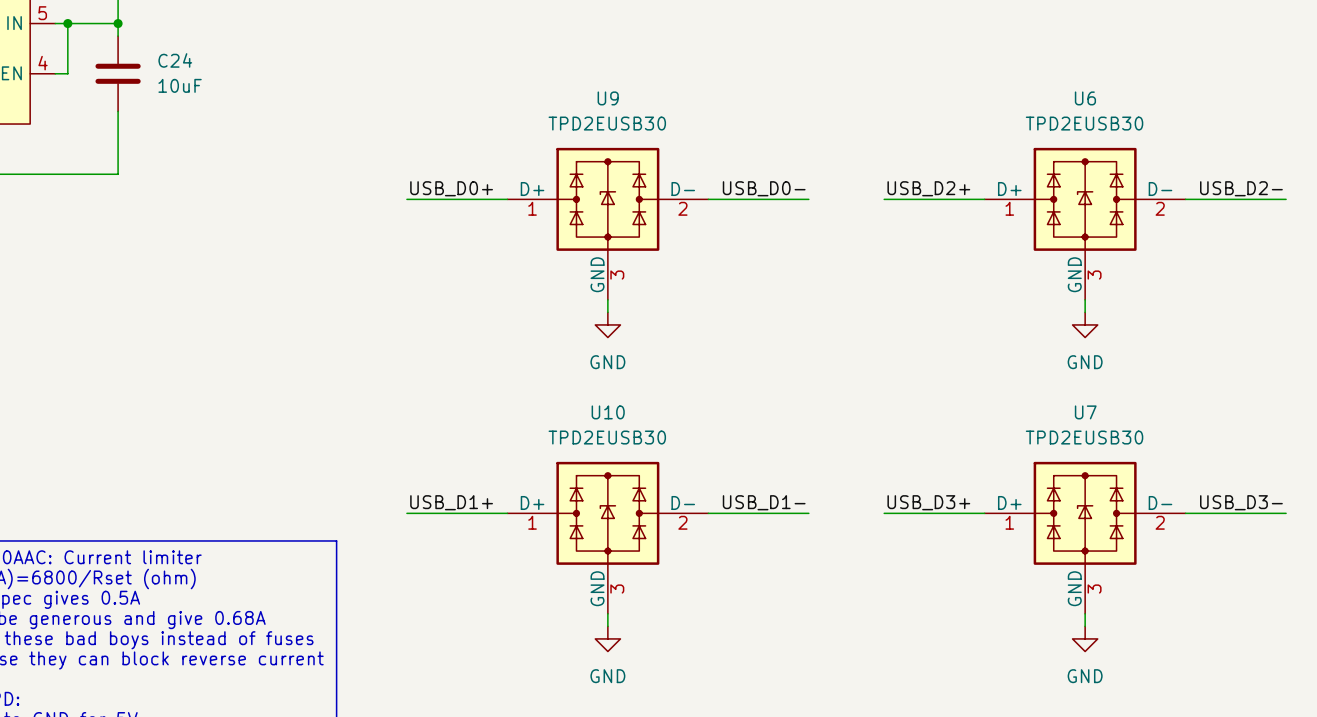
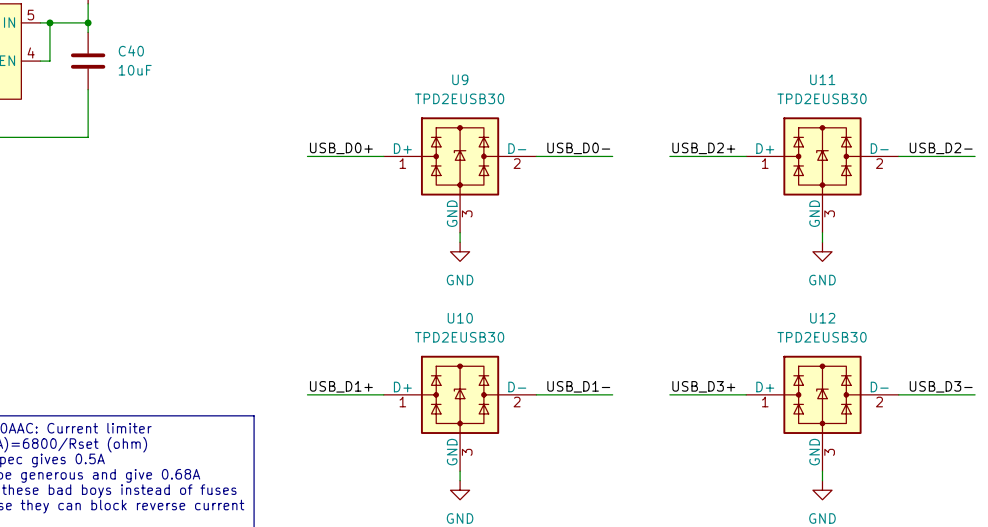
C24 name: C24 (175, 60) -> C40 (131, 50)
U6 name: U6 (1085, 98) -> U11 (822, 79)
U7 name: U7 (1085, 412) -> U12 (822, 318)

